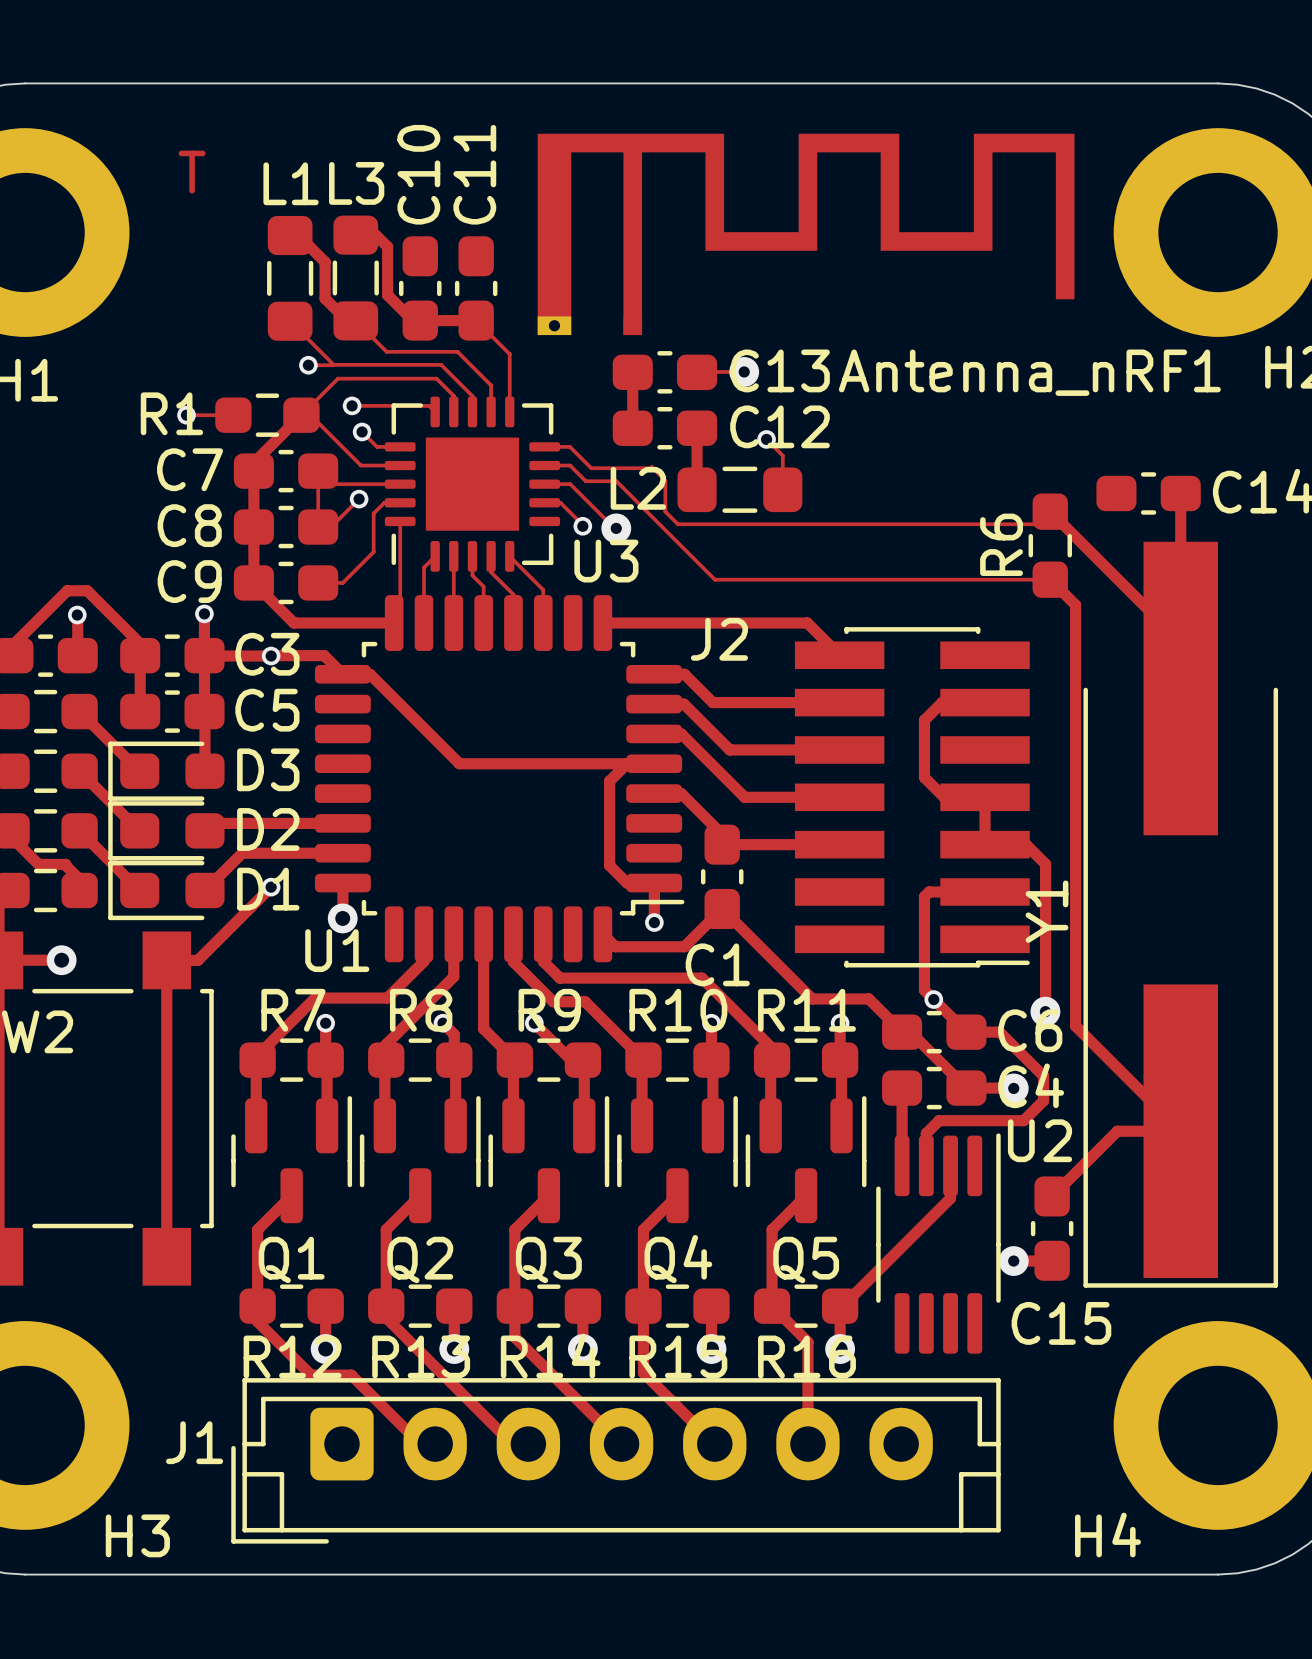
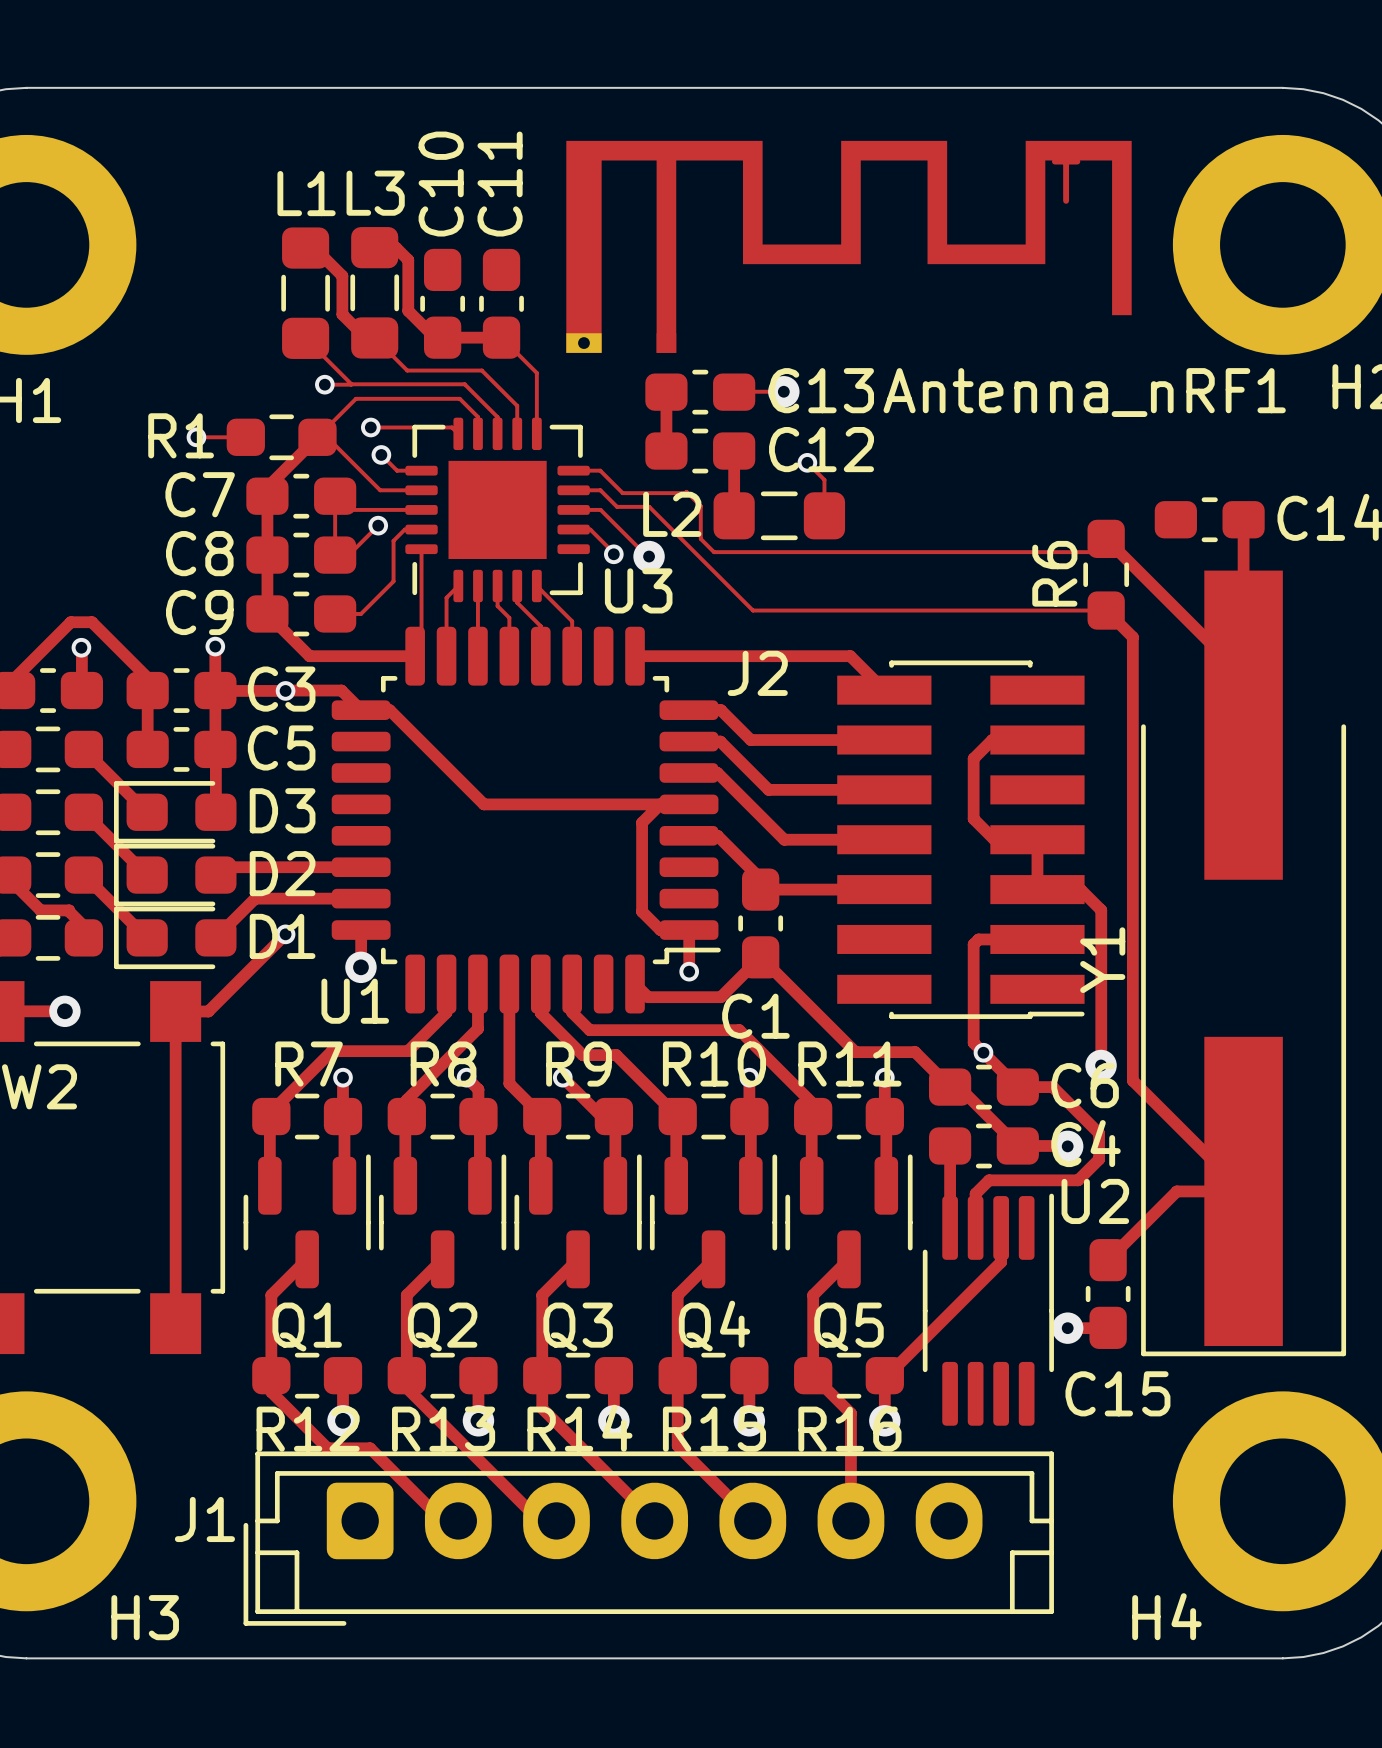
text position: T (192, 172) -> T (1066, 181)

